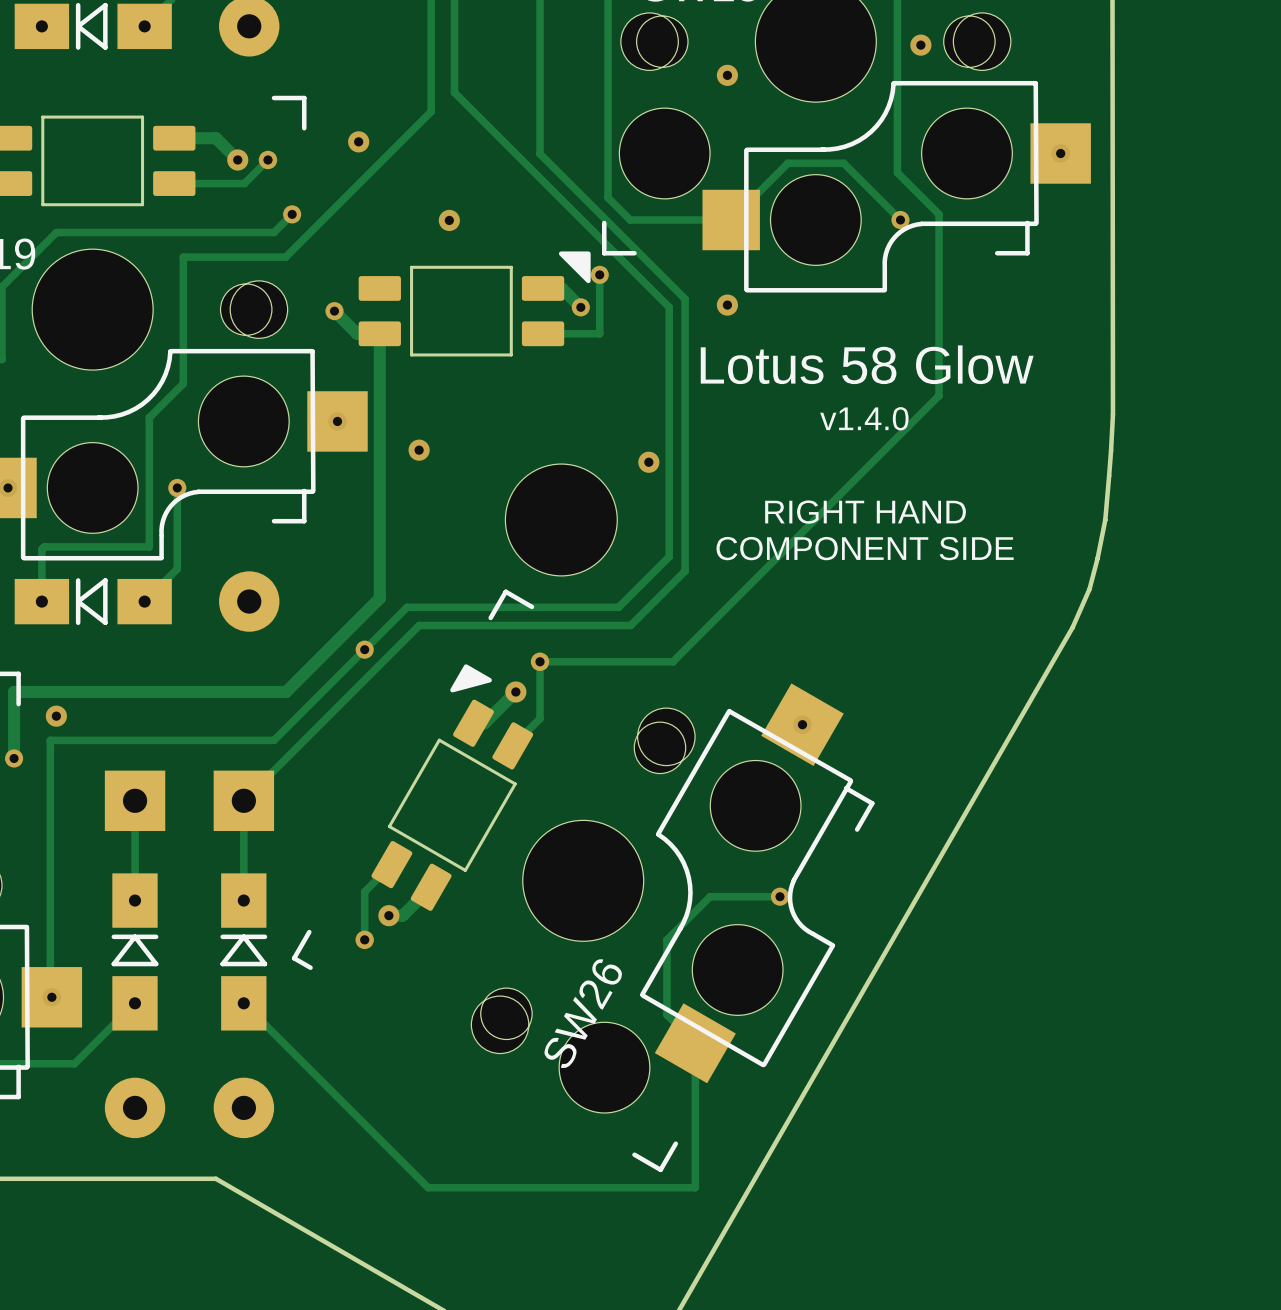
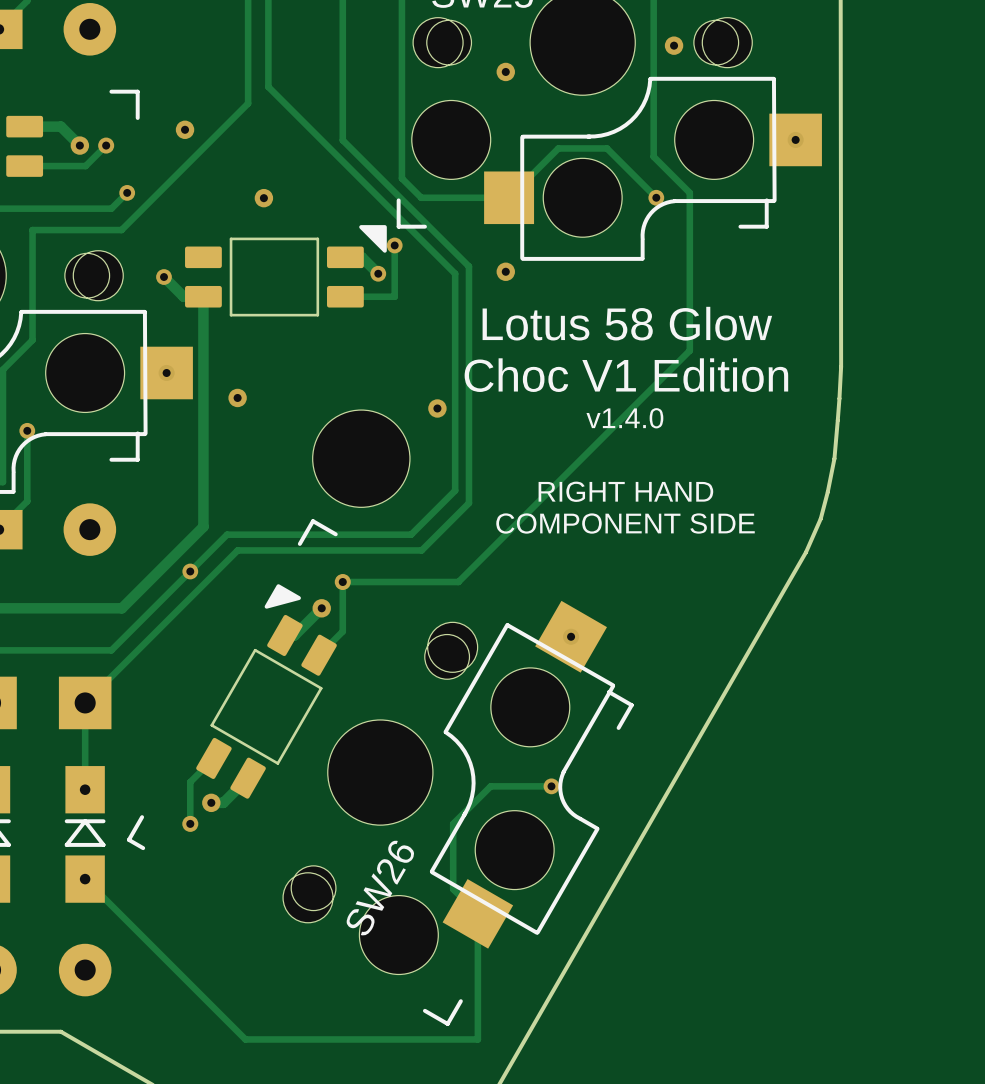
text: v1.4.0 (864, 418) -> Choc V1 Edition (626, 375)
text: none -> v1.4.0 (624, 418)
text: RIGHT HAND (865, 512) -> none
text: COMPONENT SIDE (865, 548) -> RIGHT HAND (625, 491)
text: none -> COMPONENT SIDE (625, 523)

